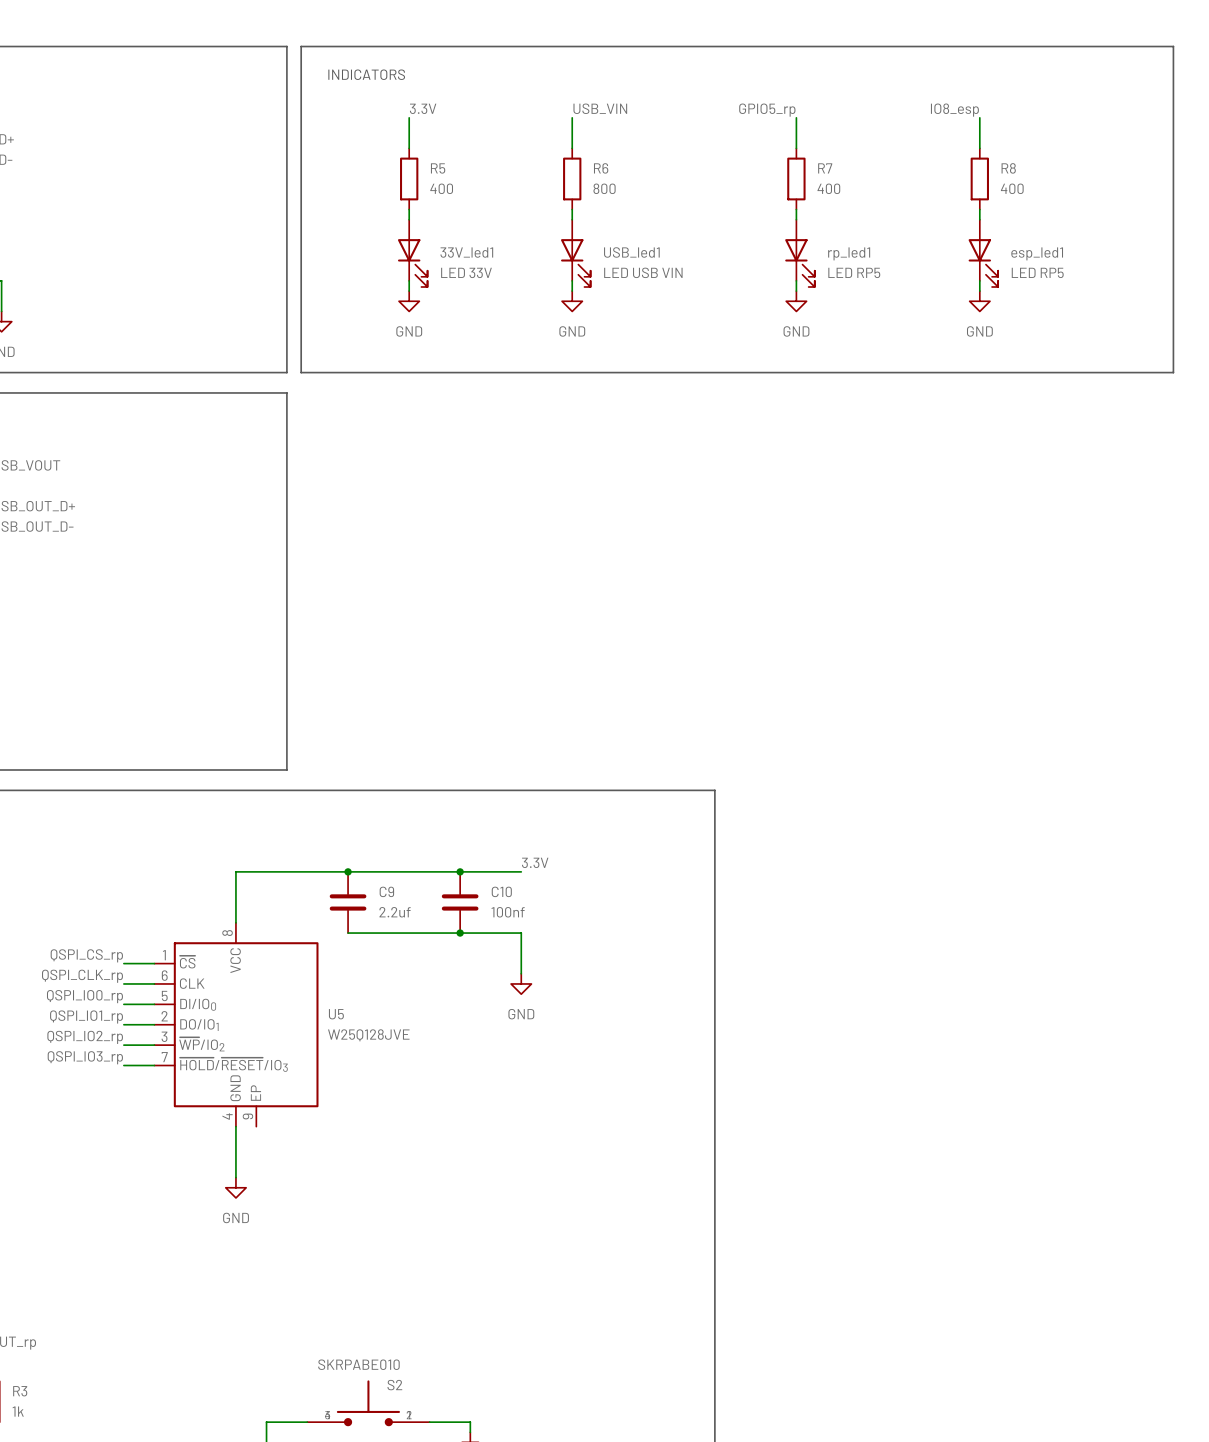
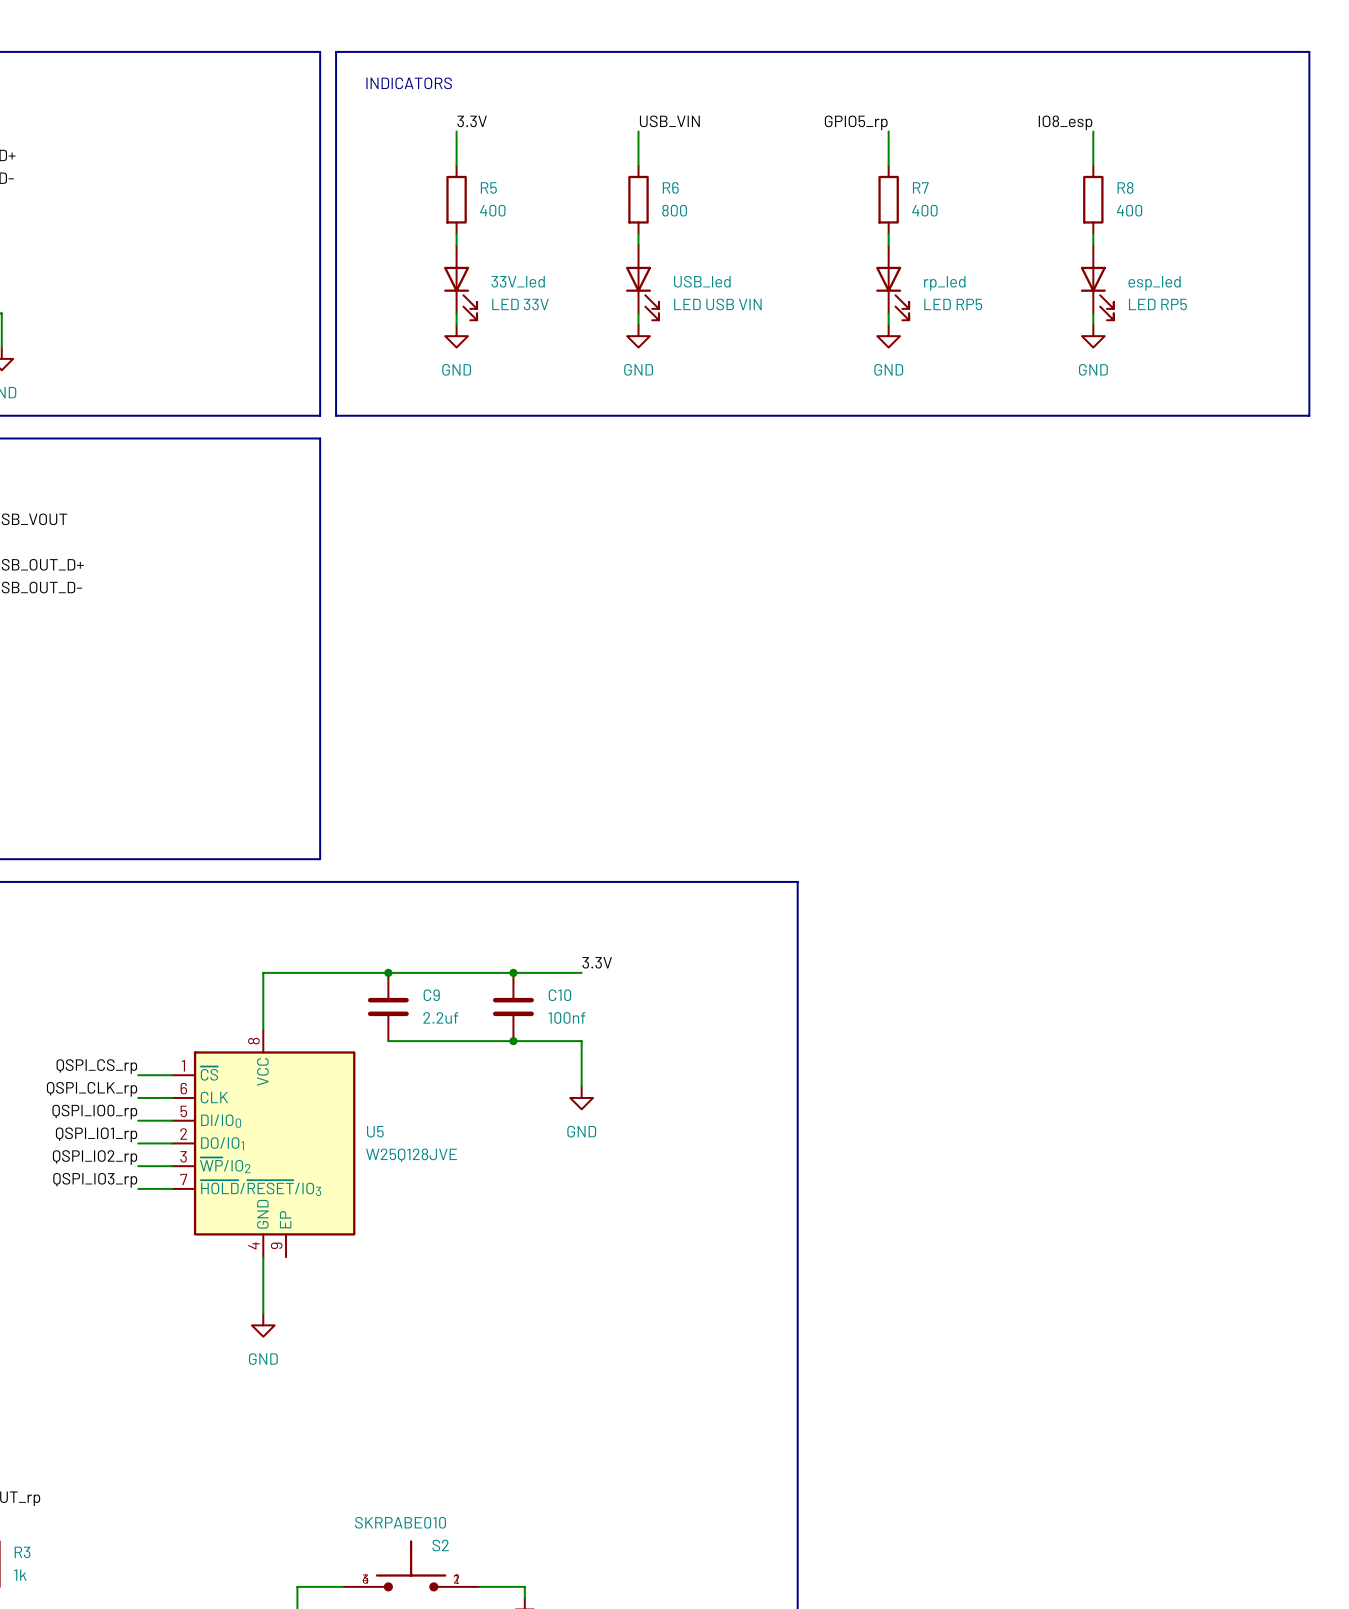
33V_led1 name: 33V_led1 (466, 252) -> 33V_led (518, 281)
USB_led1 name: USB_led1 (631, 252) -> USB_led (702, 281)
rp_led1 name: rp_led1 (849, 253) -> rp_led (944, 283)
esp_led1 name: esp_led1 (1037, 253) -> esp_led (1154, 283)

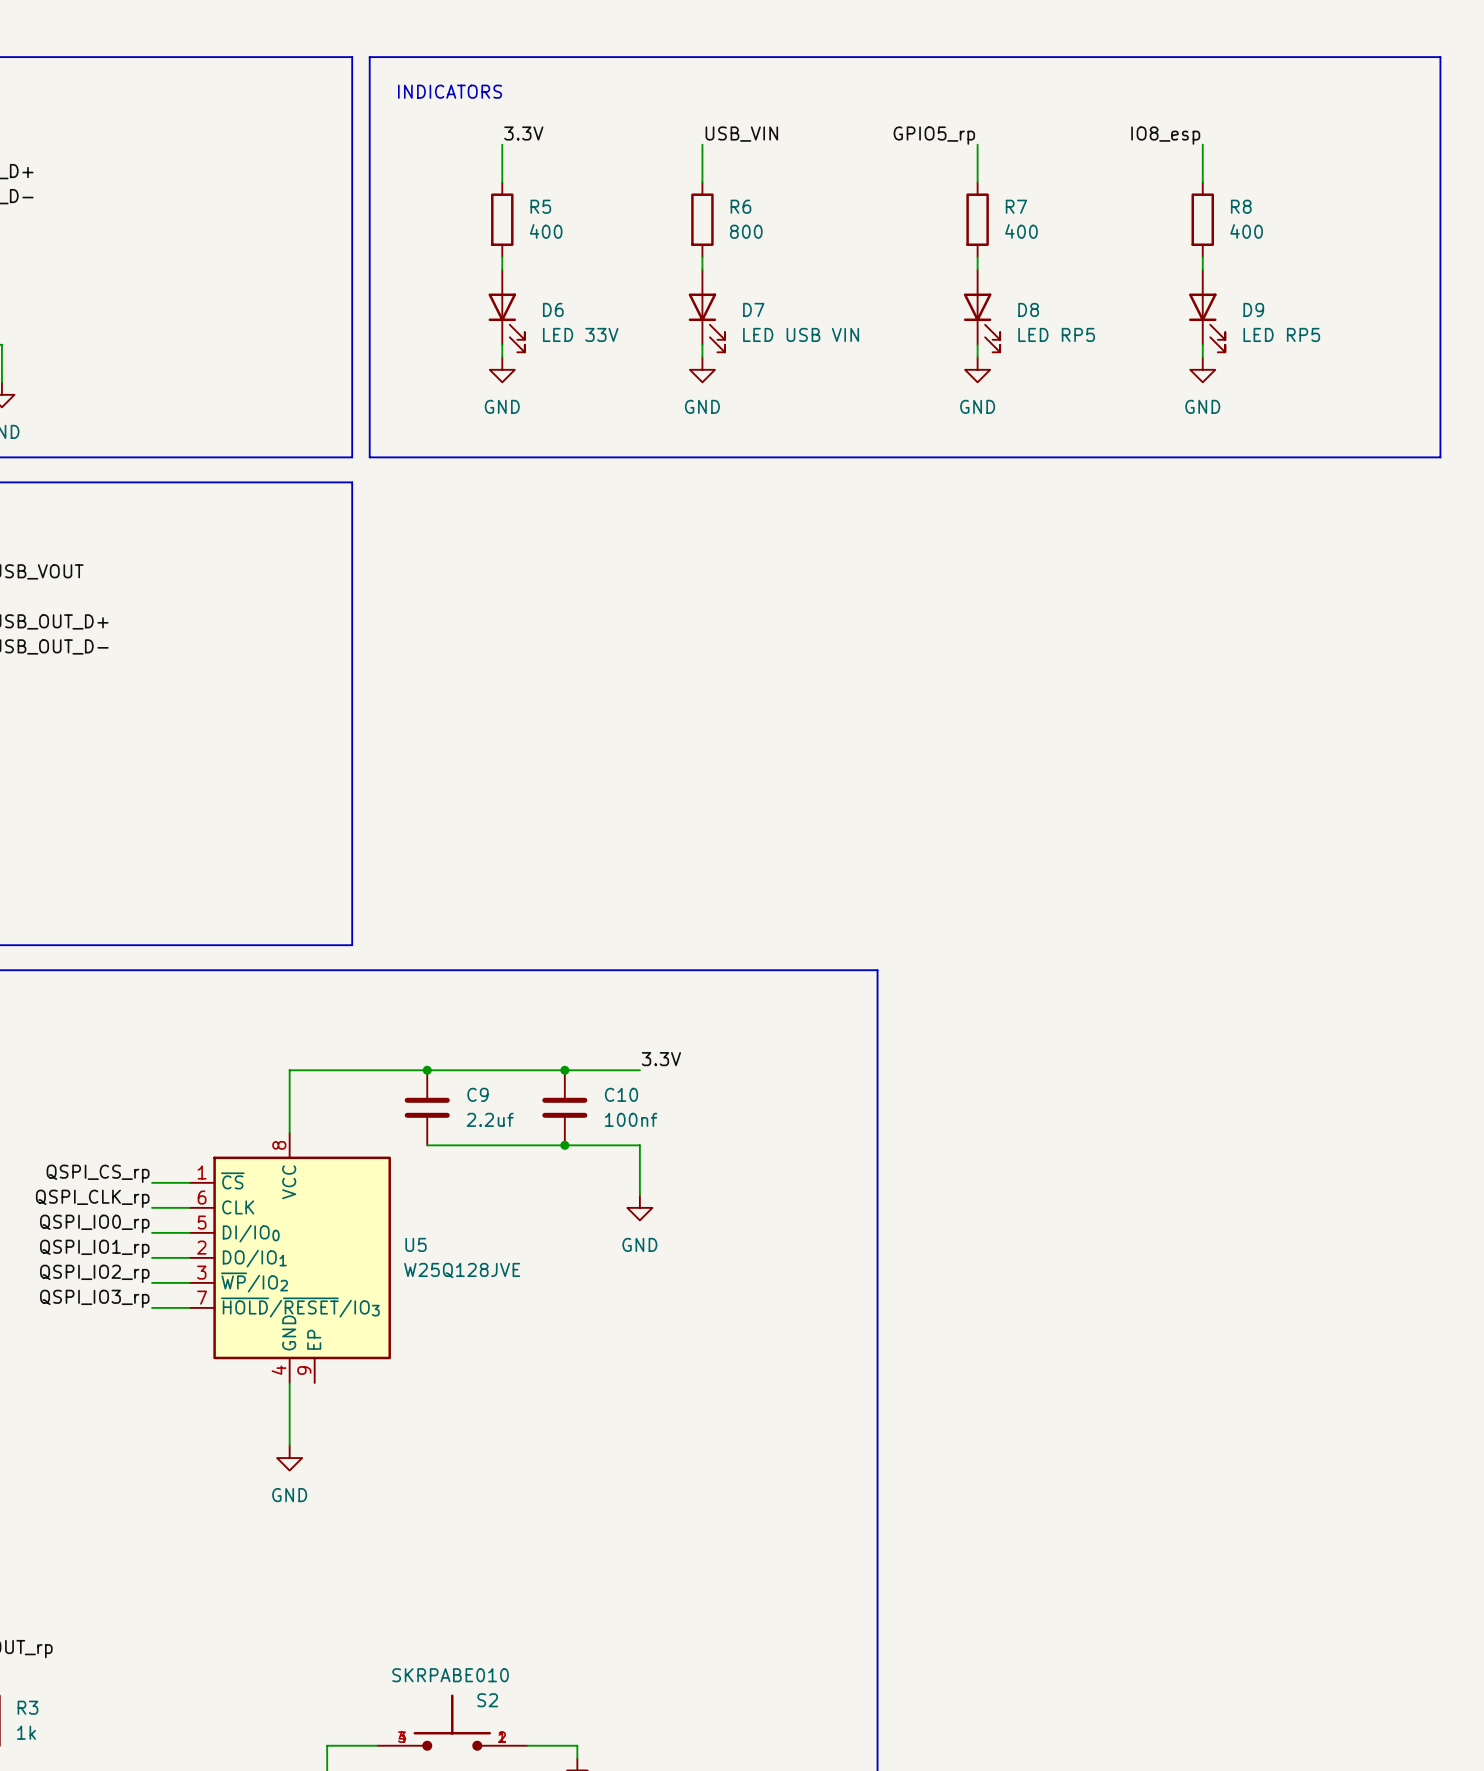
33V_led name: 33V_led (518, 281) -> D6 (553, 309)
USB_led name: USB_led (702, 281) -> D7 (753, 309)
rp_led name: rp_led (944, 283) -> D8 (1028, 309)
esp_led name: esp_led (1154, 283) -> D9 (1253, 309)

